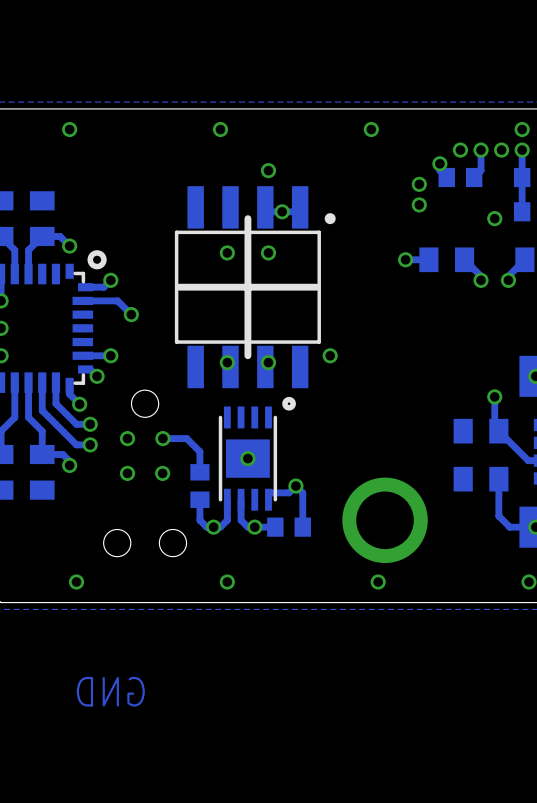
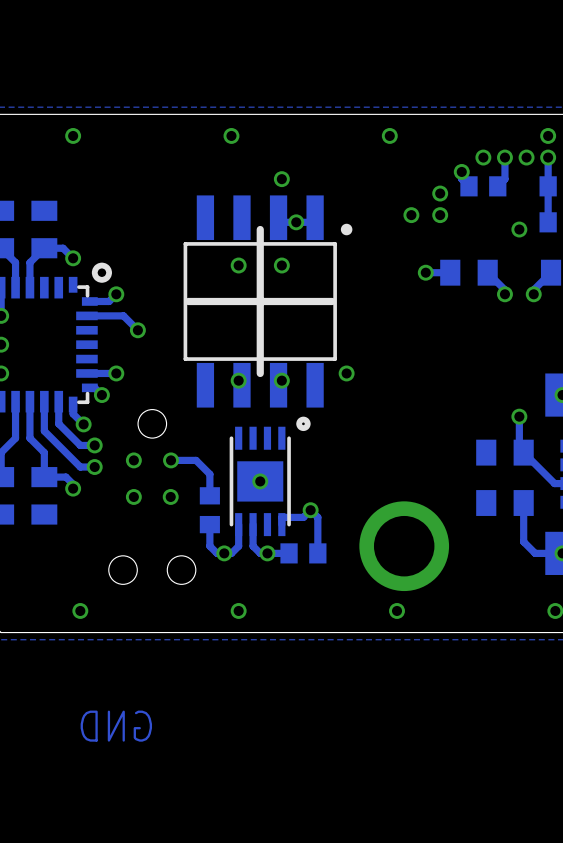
via: none -> (411, 215)

